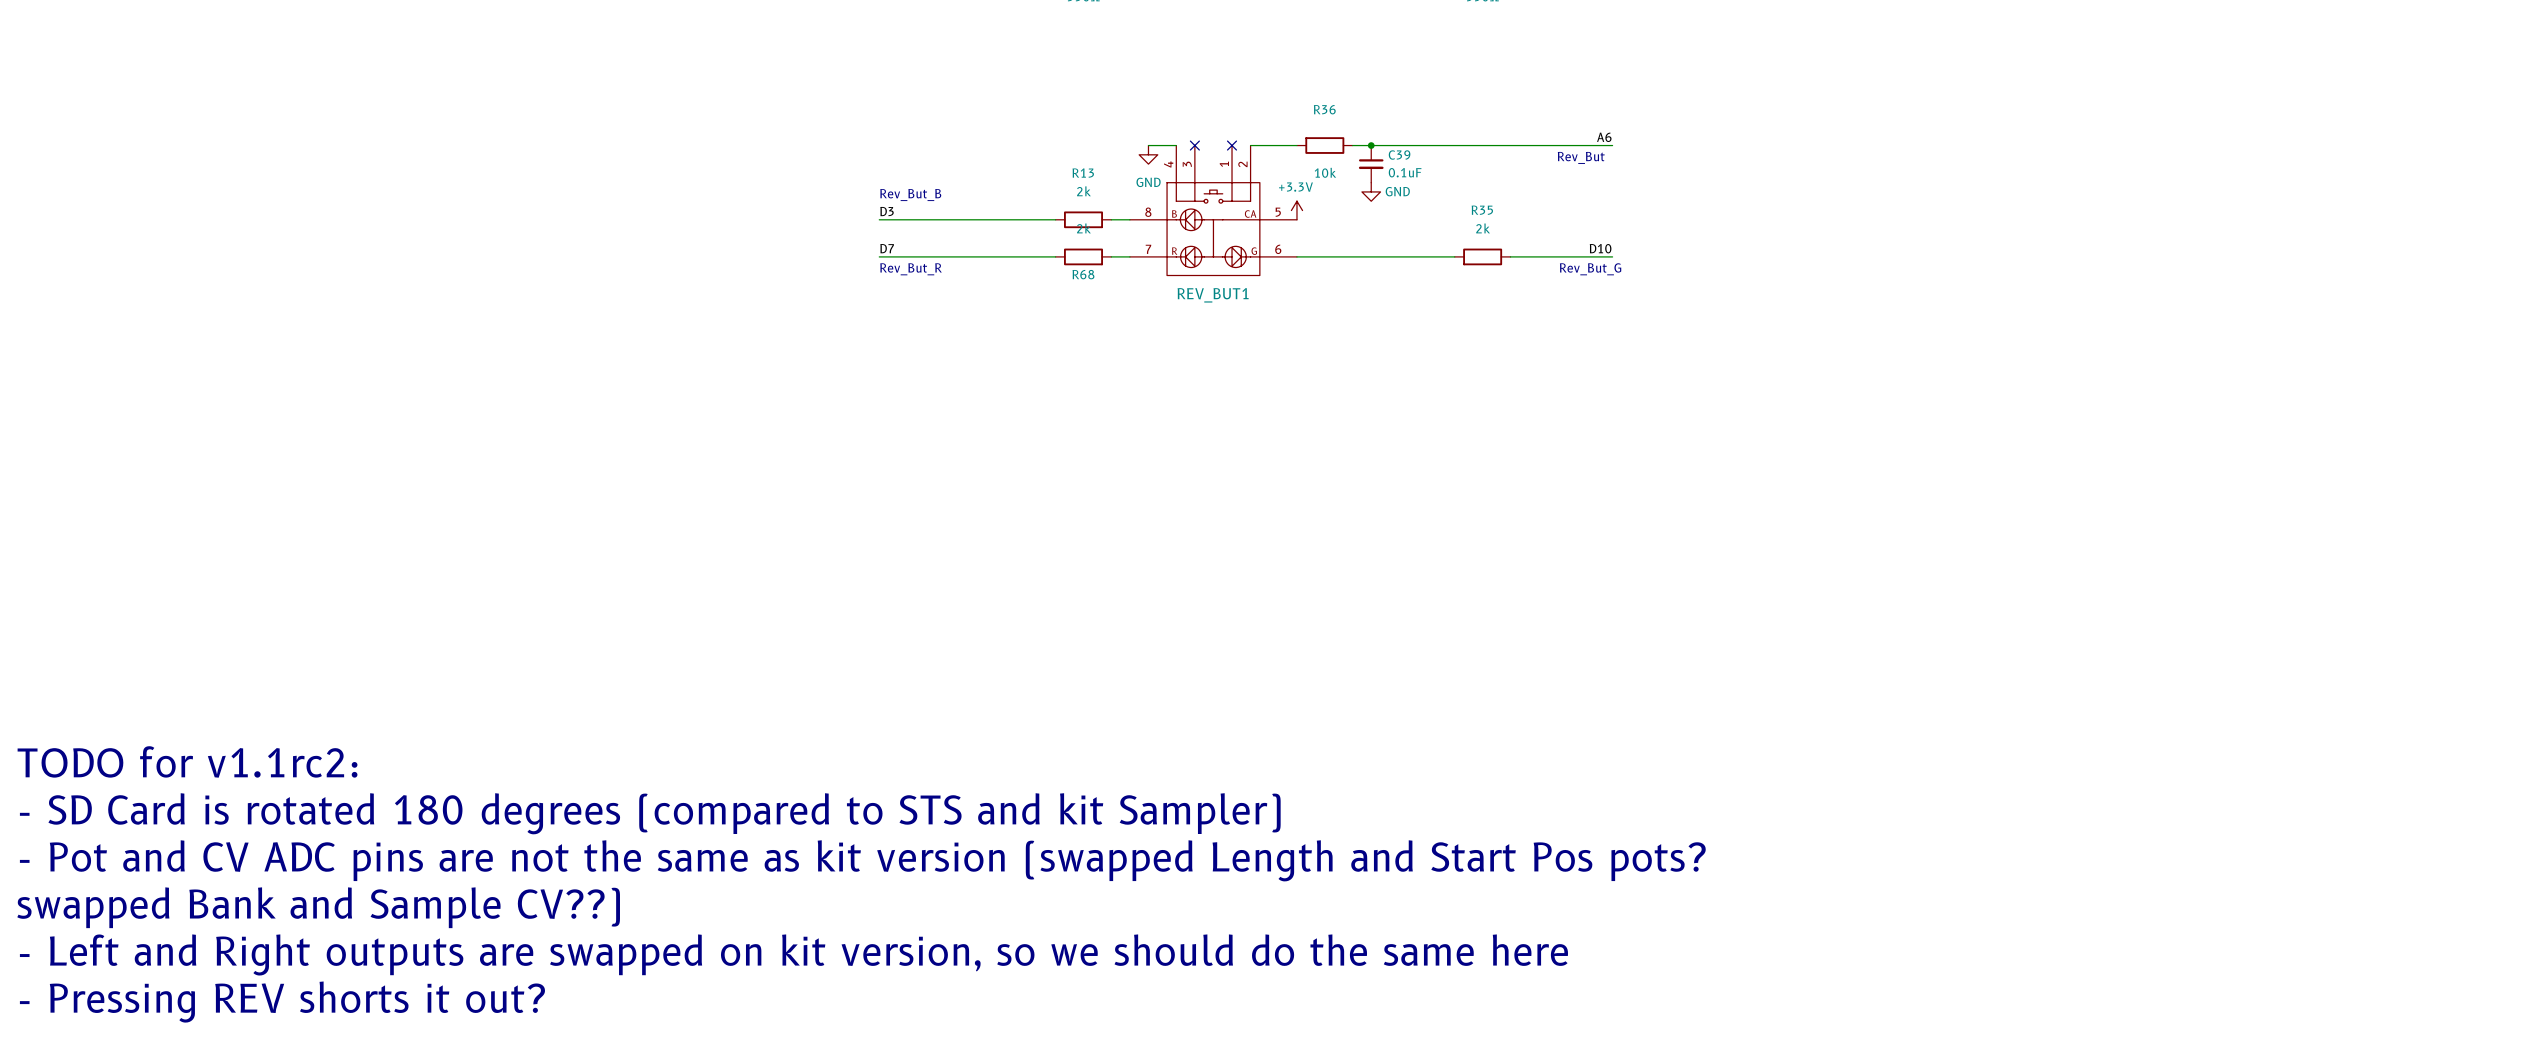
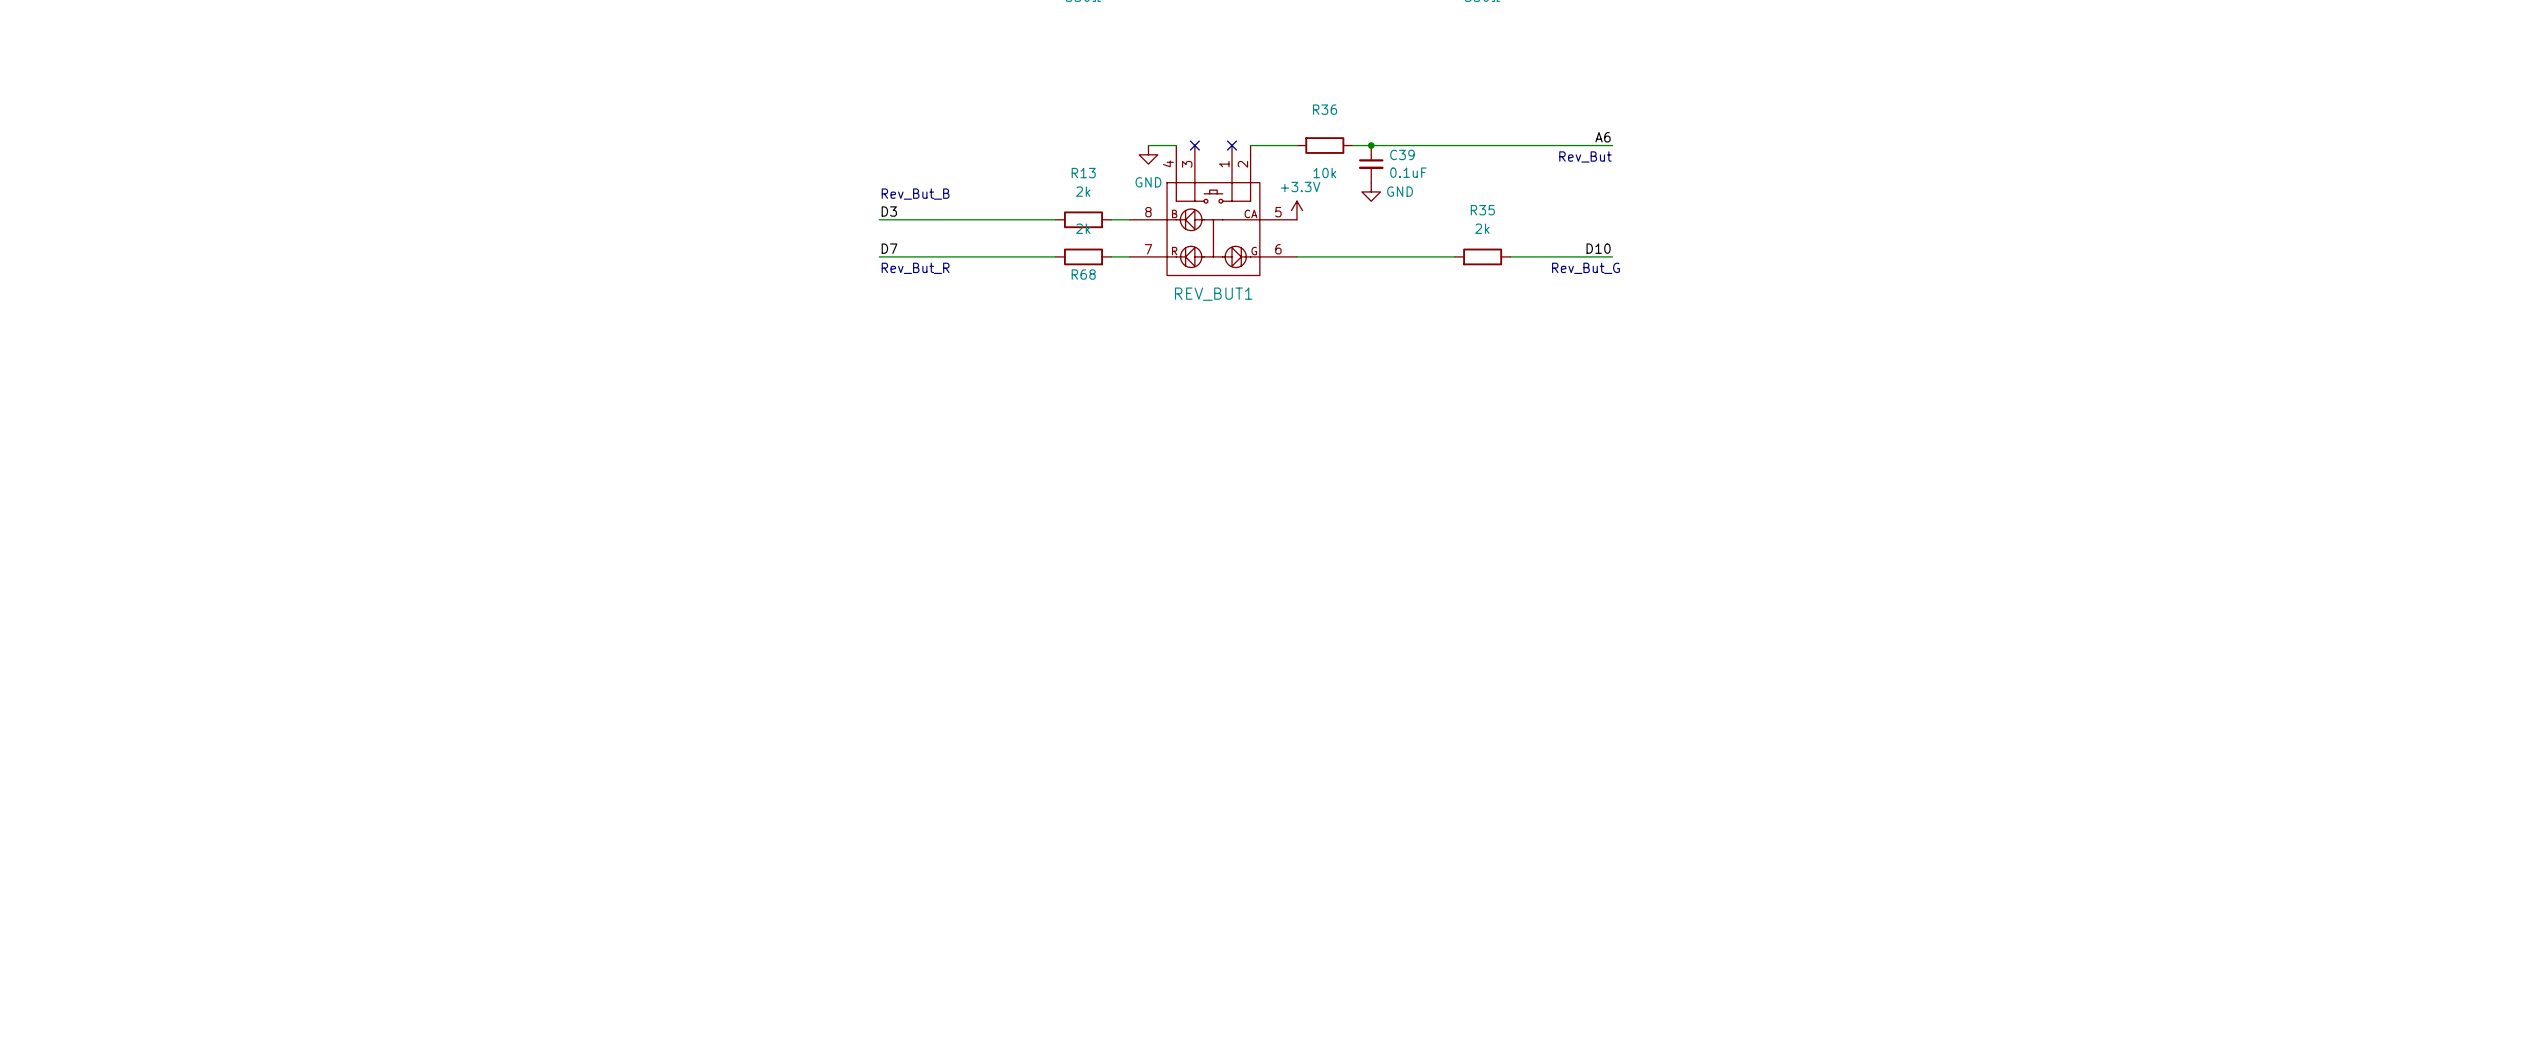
text: TODO for v1.1rc2: (187, 761) -> none
text: - SD Card is rotated 180 degrees (compared to STS and kit Sampler) (650, 813) -> none
text: - Pot and CV ADC pins are not the same as kit version (swapped Length and Start Pos pots? (862, 860) -> none
text: swapped Bank and Sample CV??) (318, 907) -> none
text: - Left and Right outputs are swapped on kit version, so we should do the same here (793, 954) -> none
text: - Pressing REV shorts it out? (282, 1002) -> none

